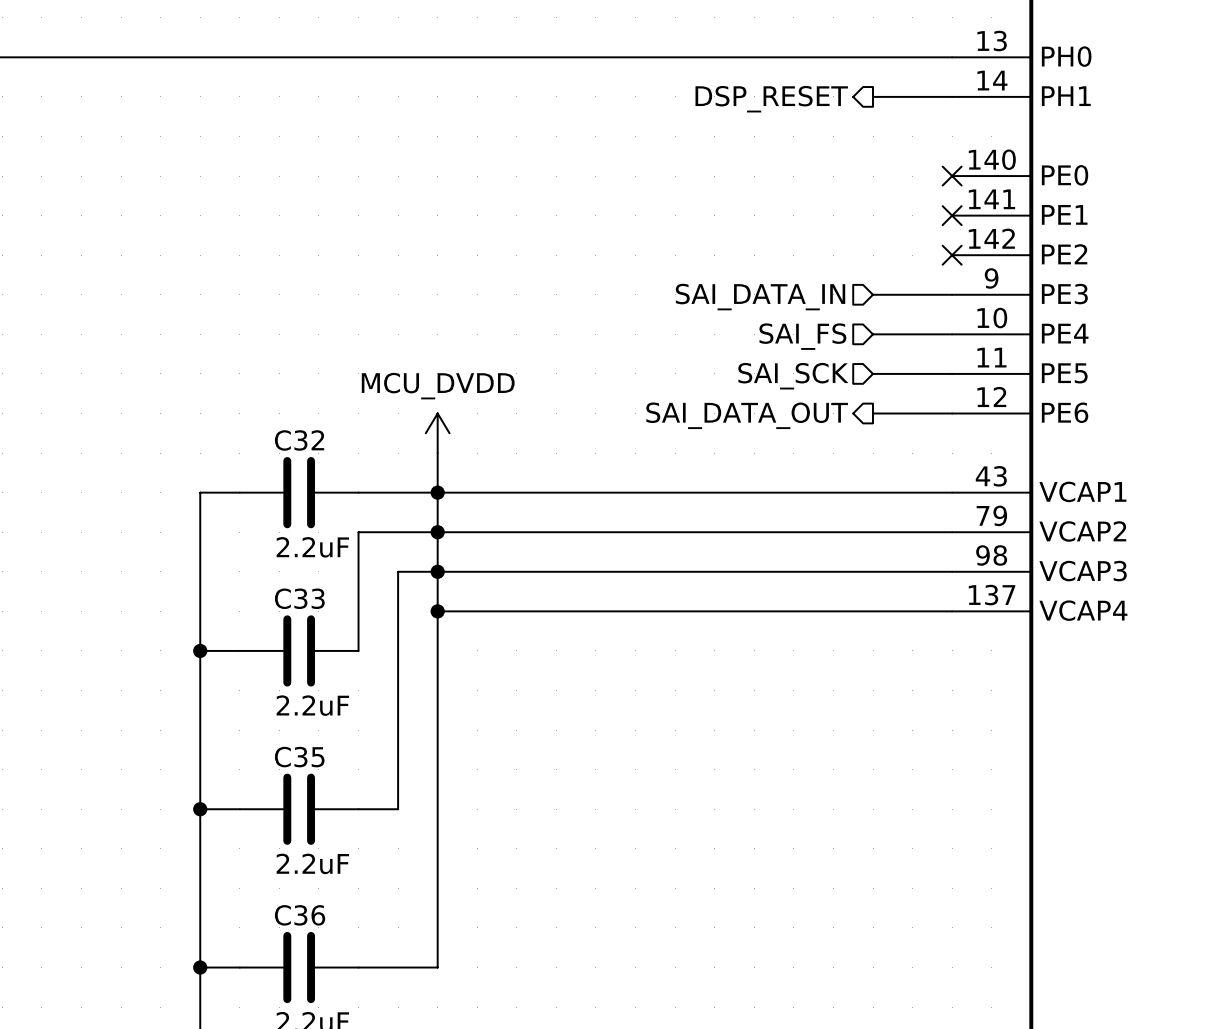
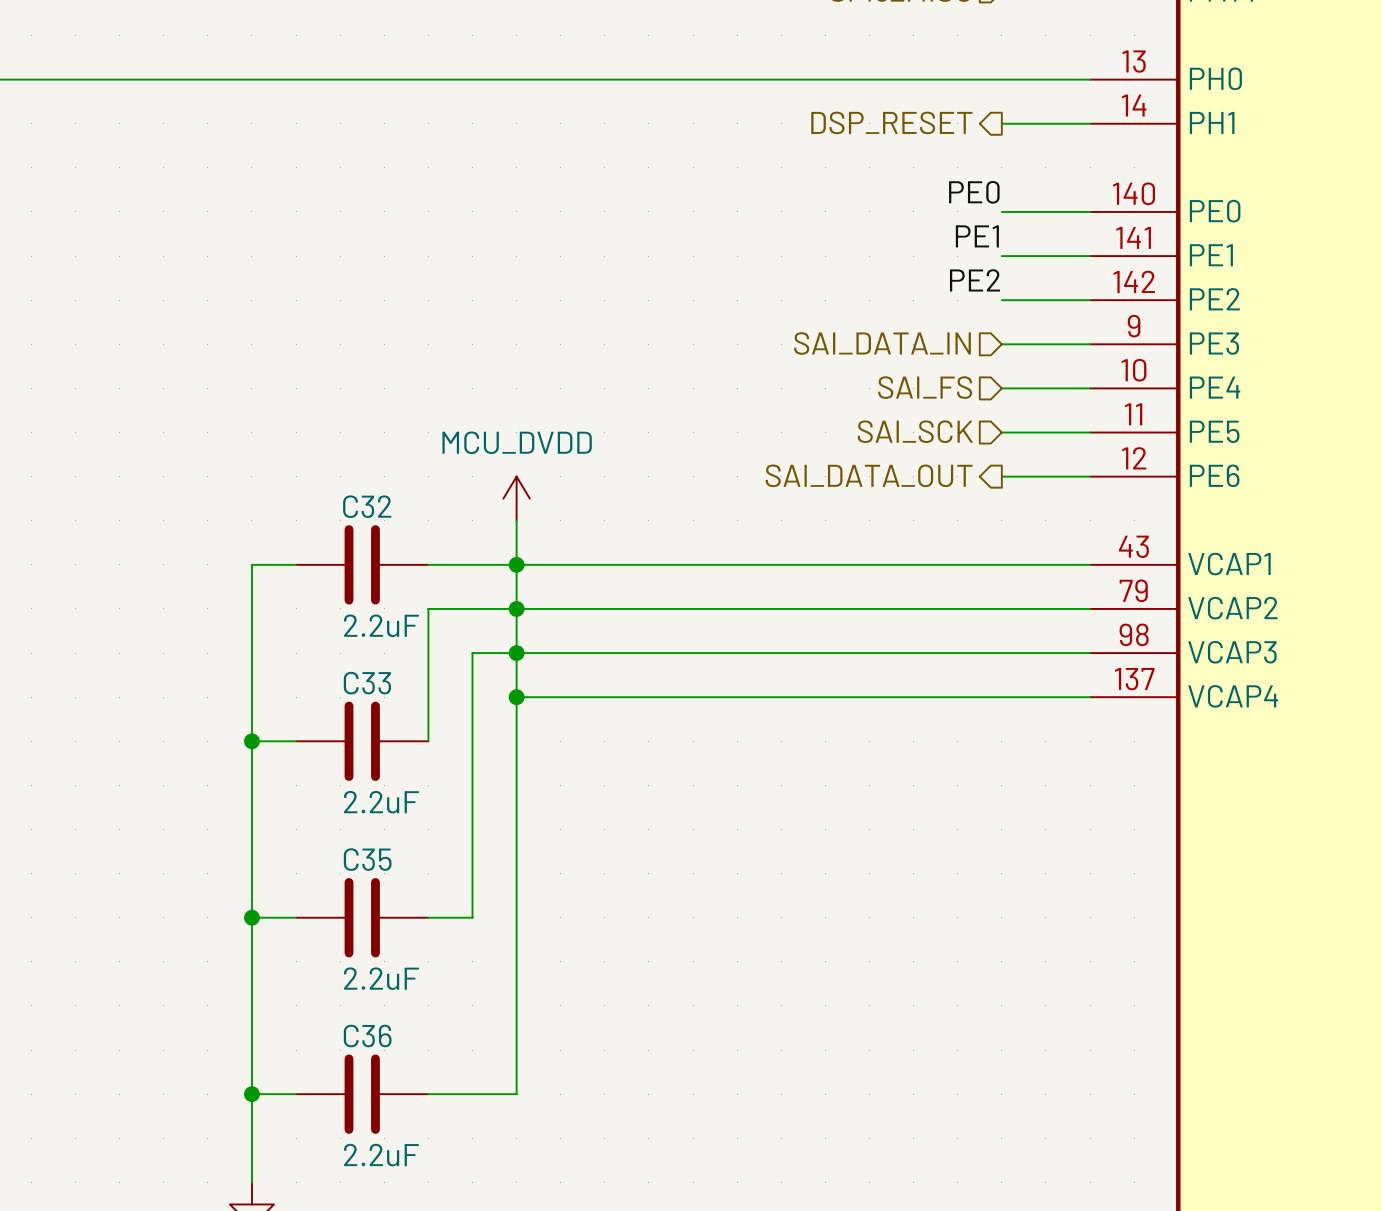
label: none -> PE0 (974, 192)
wire: none -> (1001, 211) (1090, 211)
no-connect mark: (952, 176) -> none
label: none -> PE1 (977, 236)
wire: none -> (1001, 256) (1090, 256)
no-connect mark: (952, 215) -> none
label: none -> PE2 (974, 280)
wire: none -> (1001, 300) (1090, 300)
no-connect mark: (952, 255) -> none

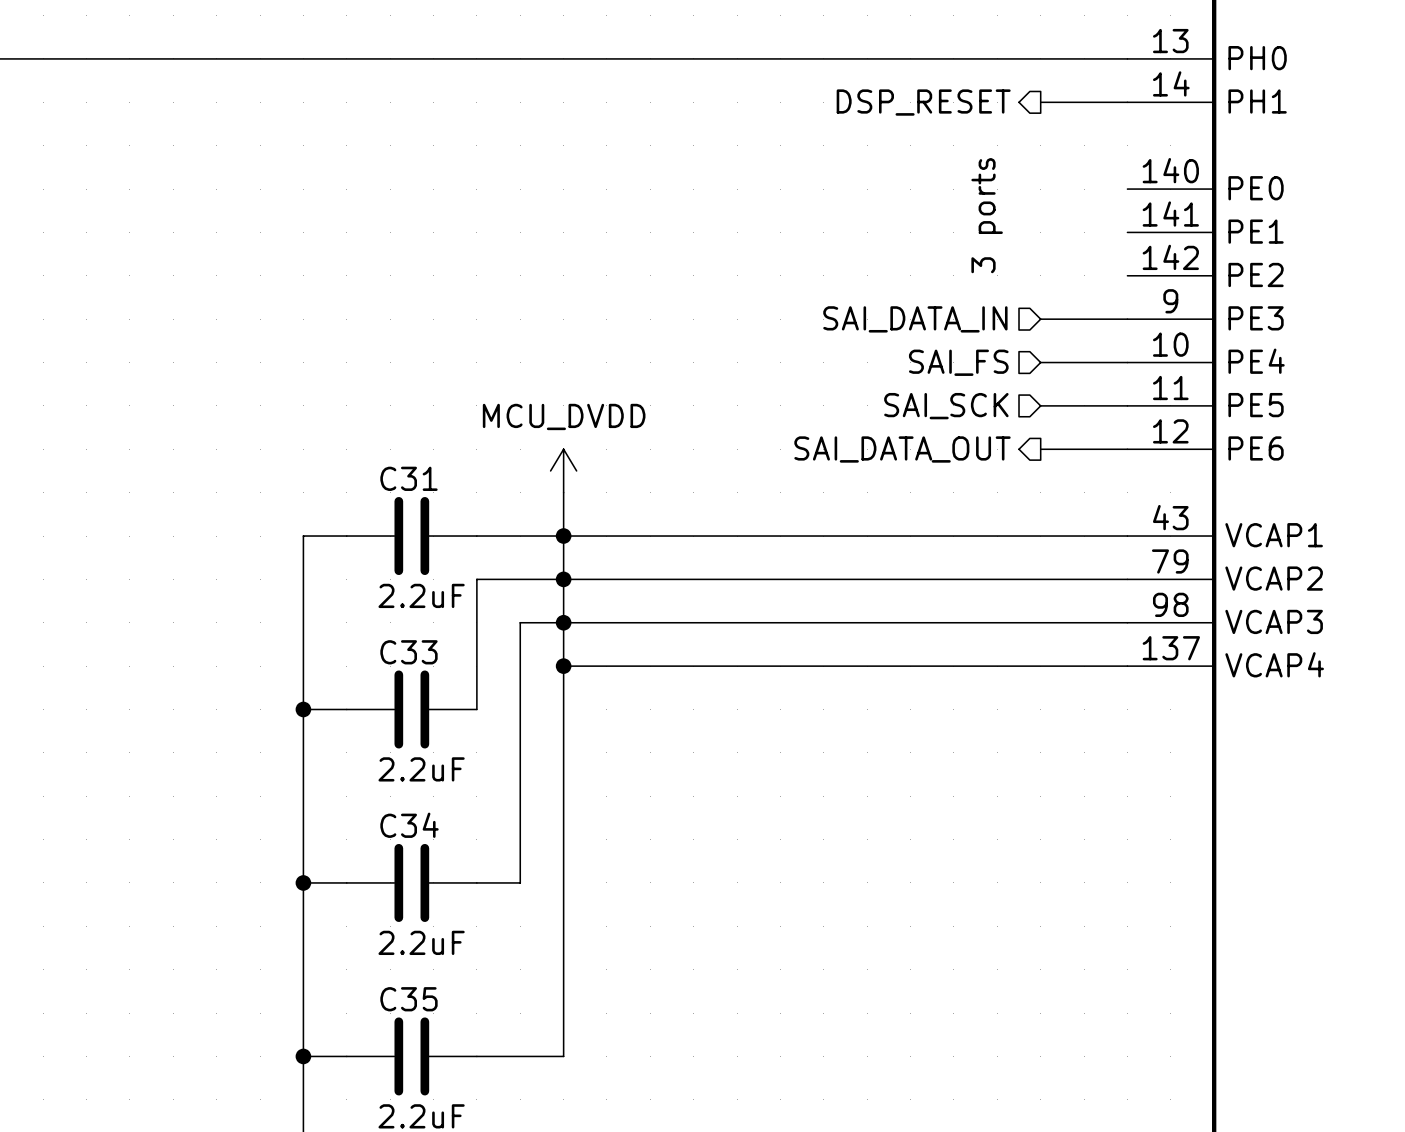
label: PE0 (974, 192) -> none
wire: (1001, 211) (1090, 211) -> none
label: PE1 (977, 236) -> none
text: none -> 3 ports (987, 215)
wire: (1001, 256) (1090, 256) -> none
label: PE2 (974, 280) -> none
wire: (1001, 300) (1090, 300) -> none
C32 name: C32 (367, 506) -> C31 (408, 478)
C35 name: C35 (367, 859) -> C34 (409, 825)
C36 name: C36 (367, 1036) -> C35 (408, 999)

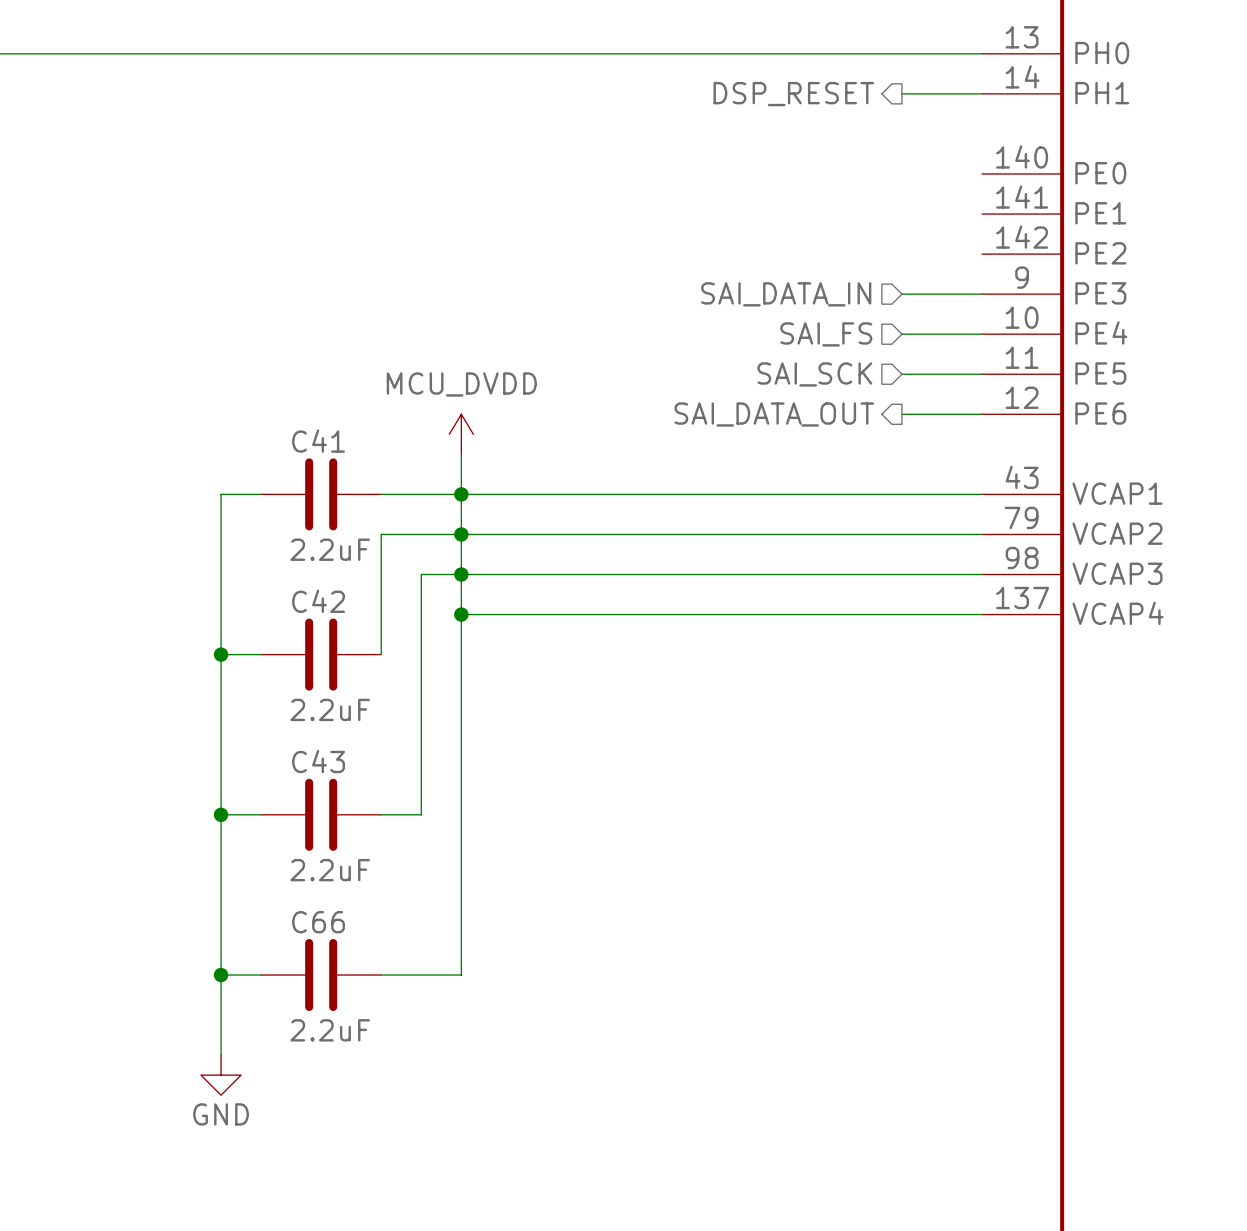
text: 3 ports (987, 215) -> none
C31 name: C31 (408, 478) -> C41 (318, 441)
C33 name: C33 (408, 652) -> C42 (318, 601)
C34 name: C34 (409, 825) -> C43 (318, 761)
C35 name: C35 (408, 999) -> C66 (318, 922)

